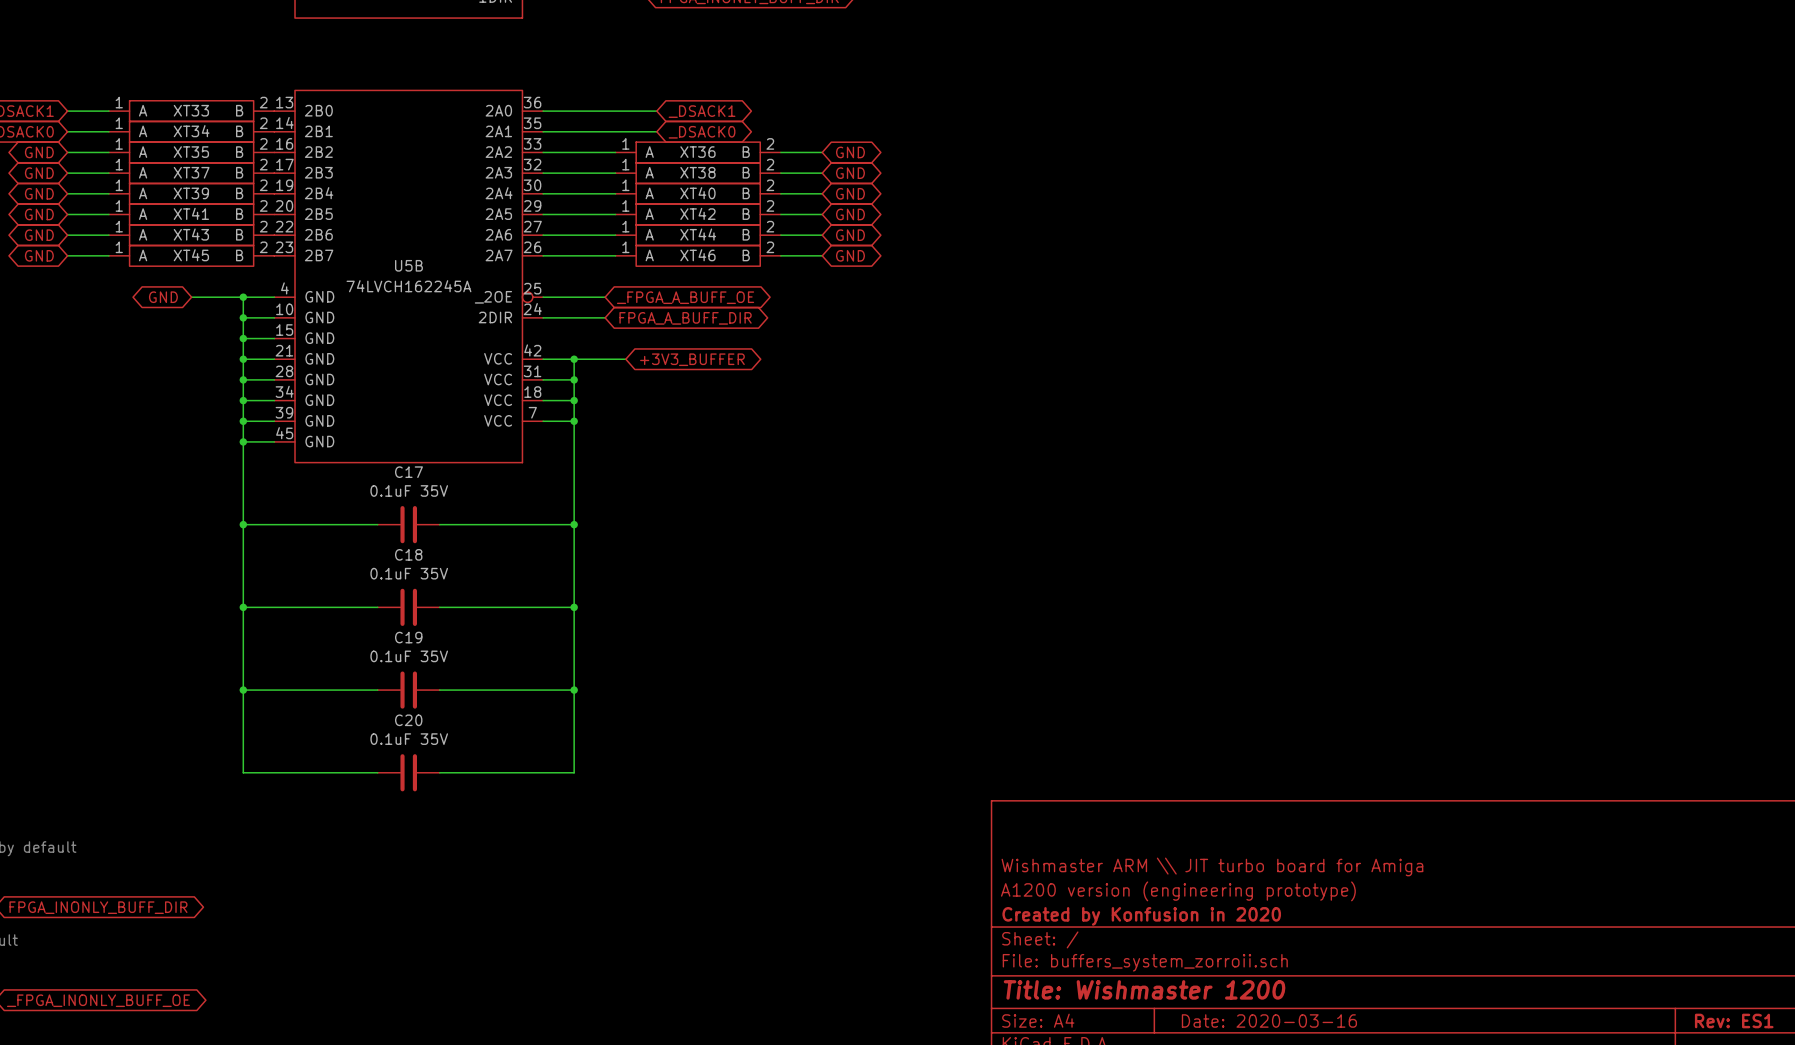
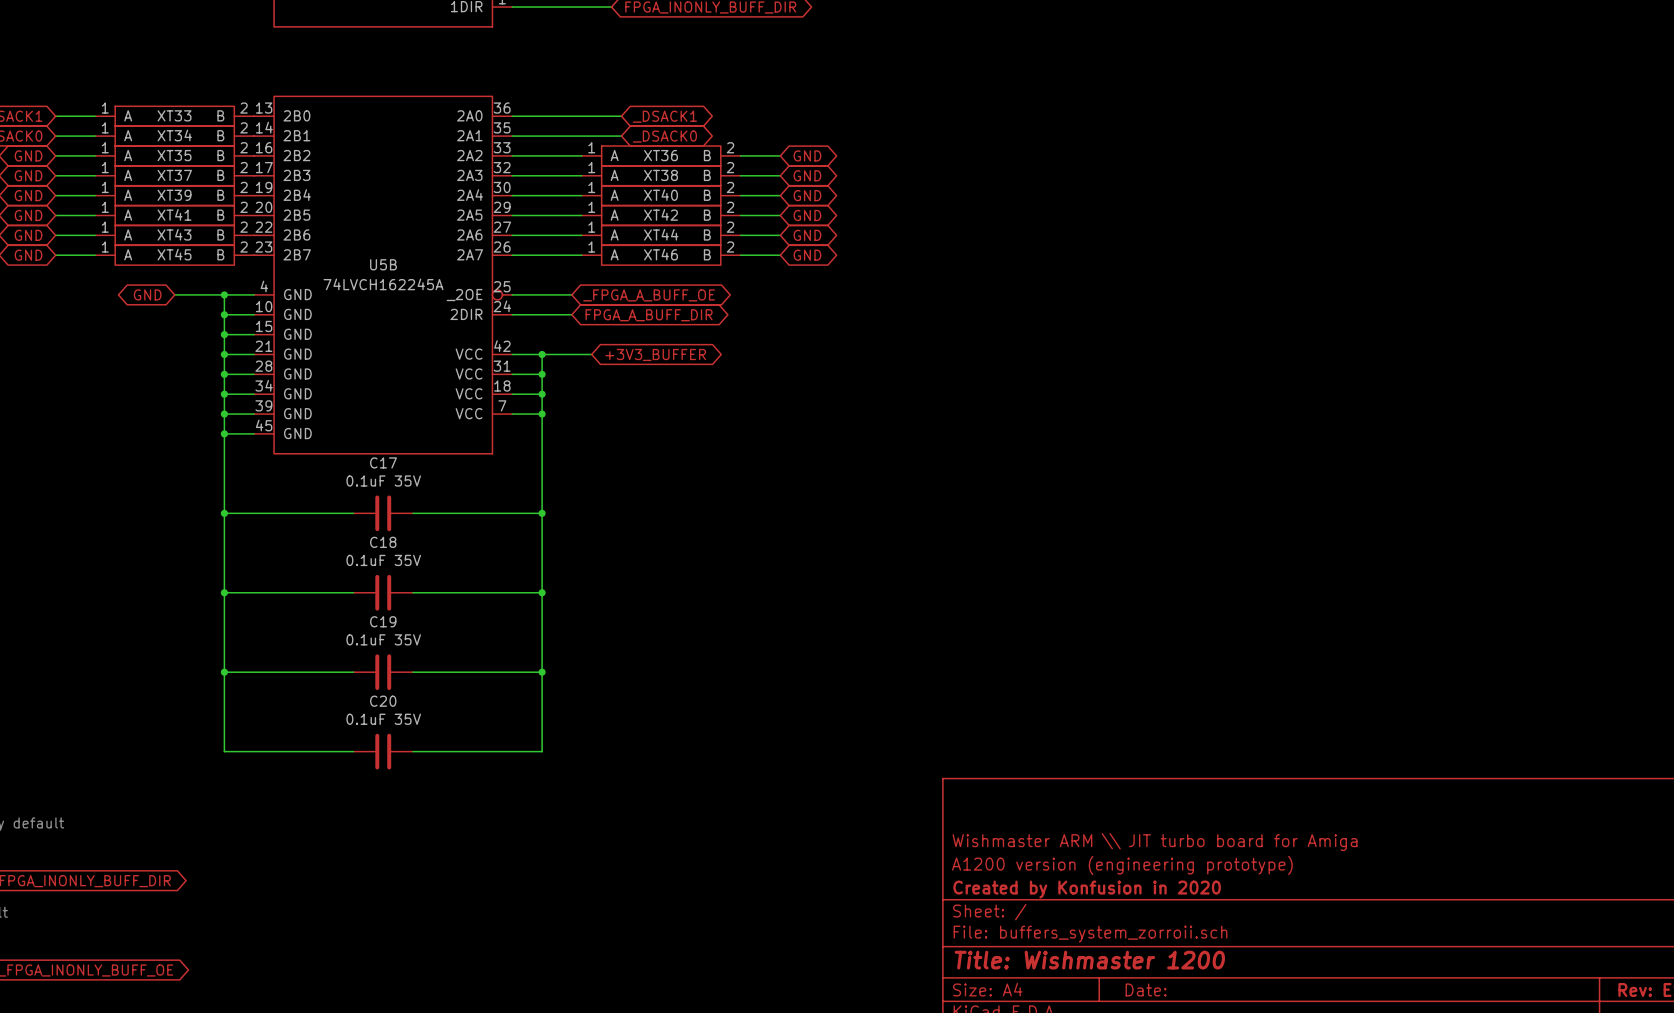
title block: Date: 2020-03-16 (1269, 1020) -> Date: (1146, 989)

